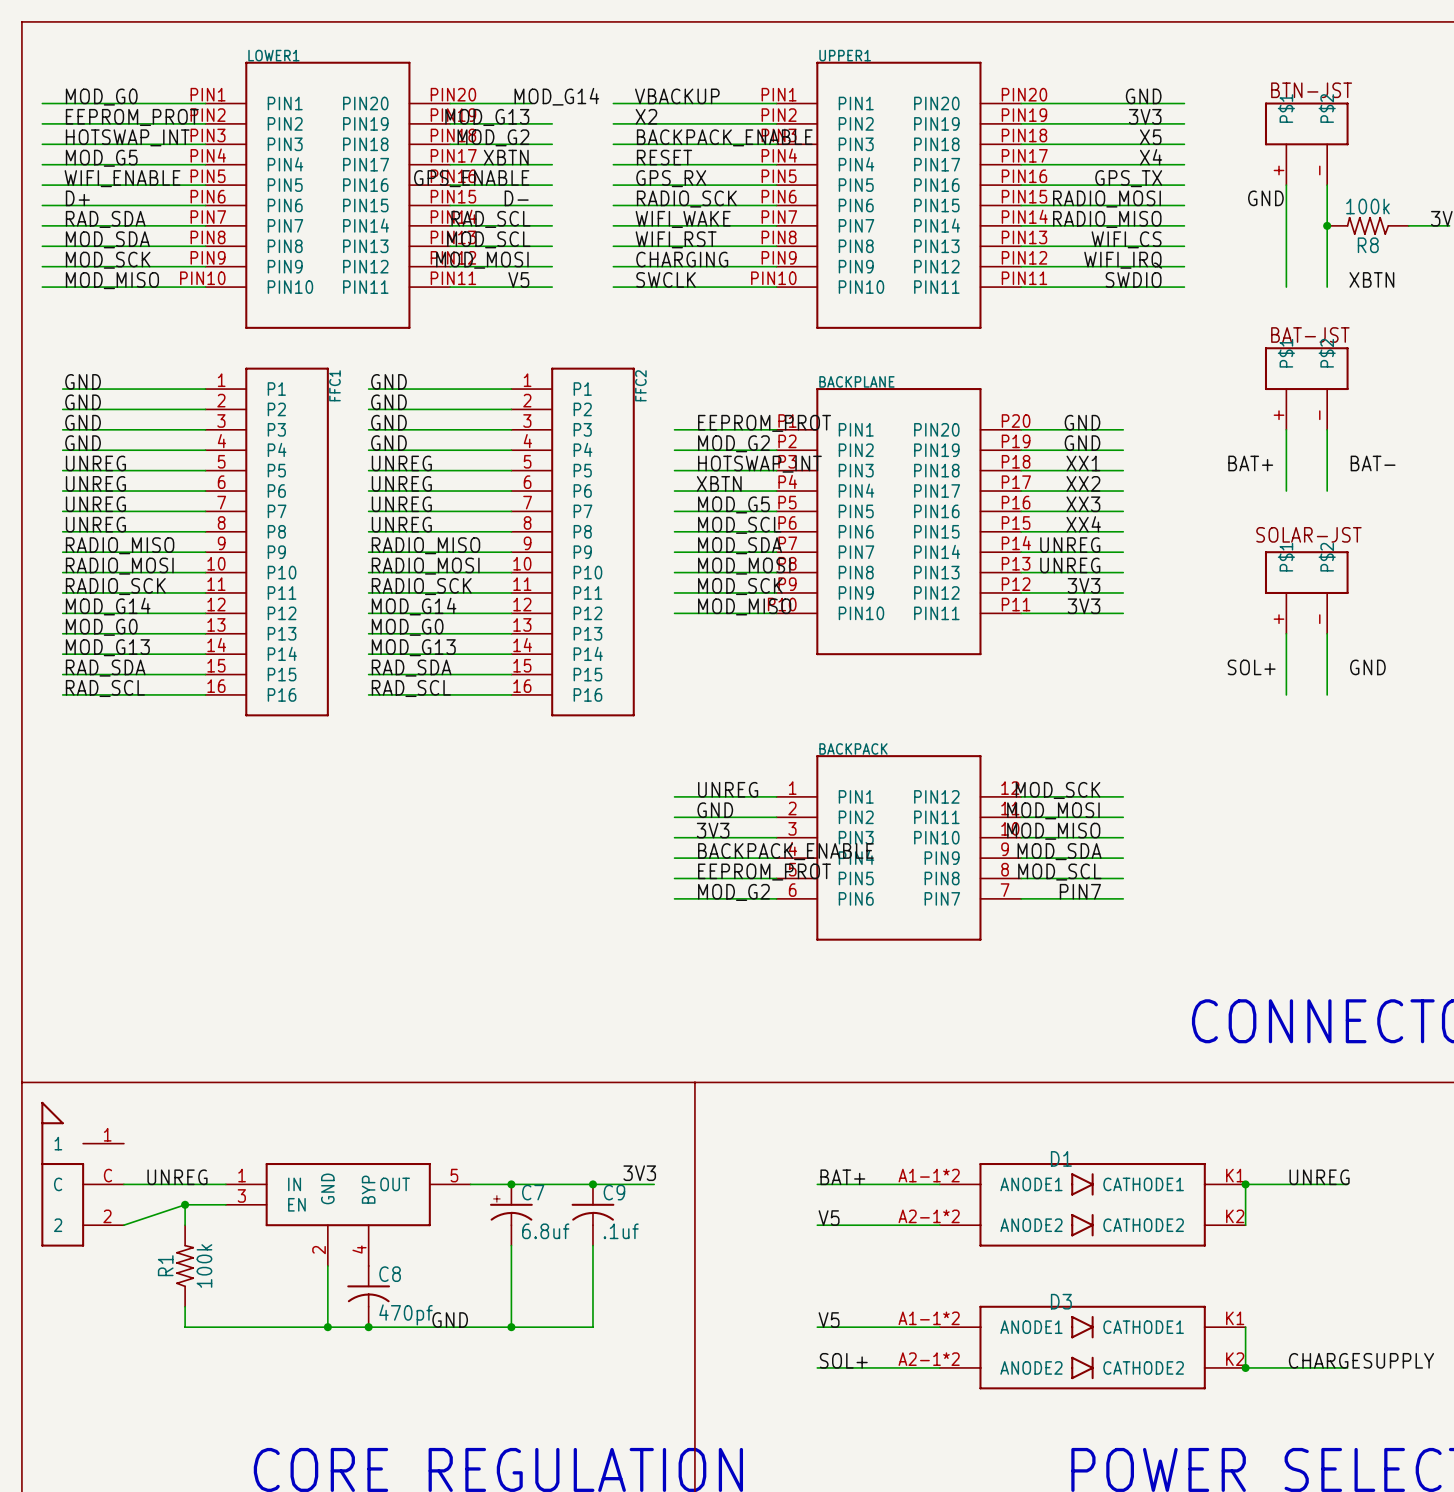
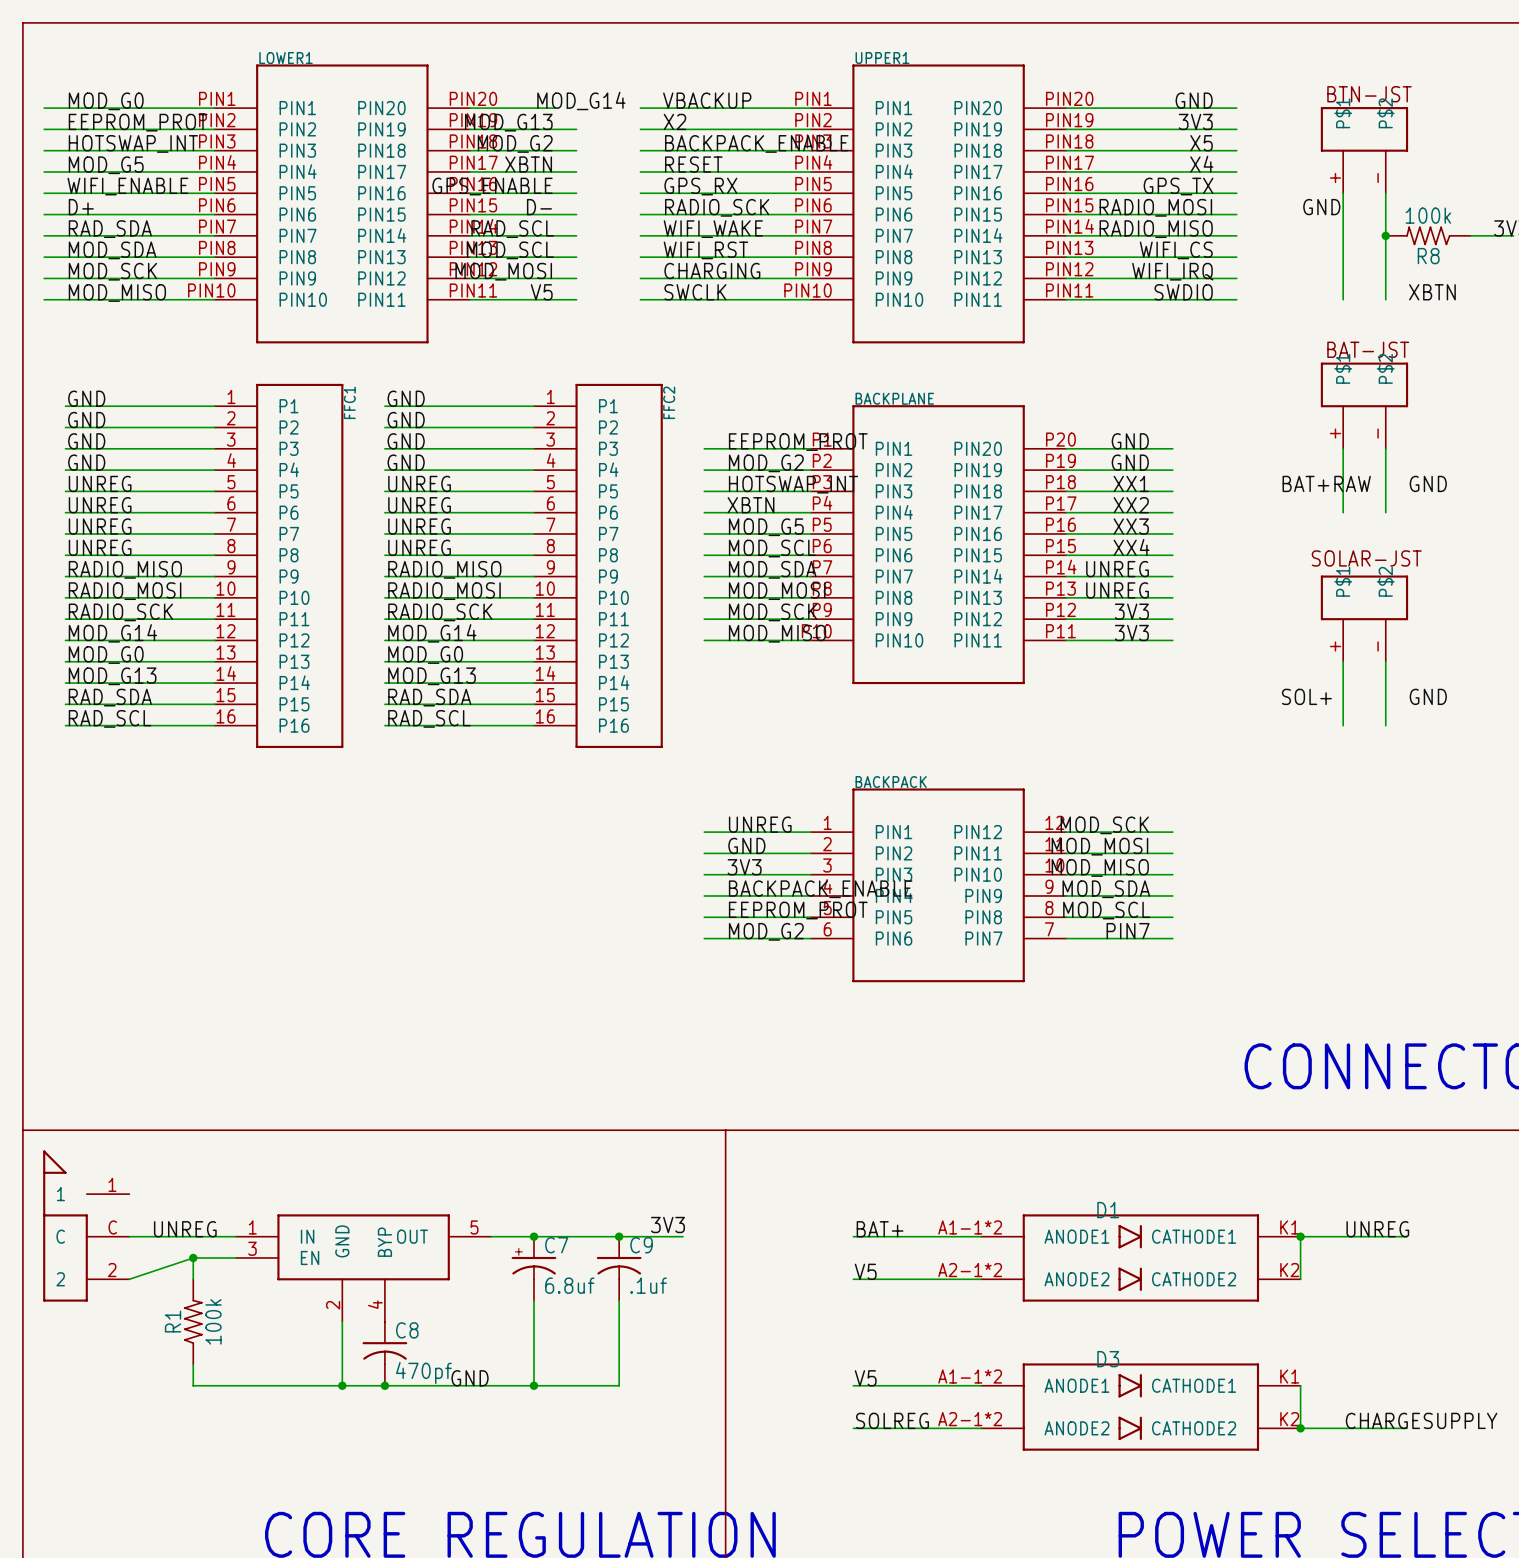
label: BAT+ (1250, 463) -> BAT+RAW (1326, 483)
label: BAT- (1373, 463) -> GND (1428, 483)
label: SOL+ (843, 1360) -> SOLREG (892, 1420)

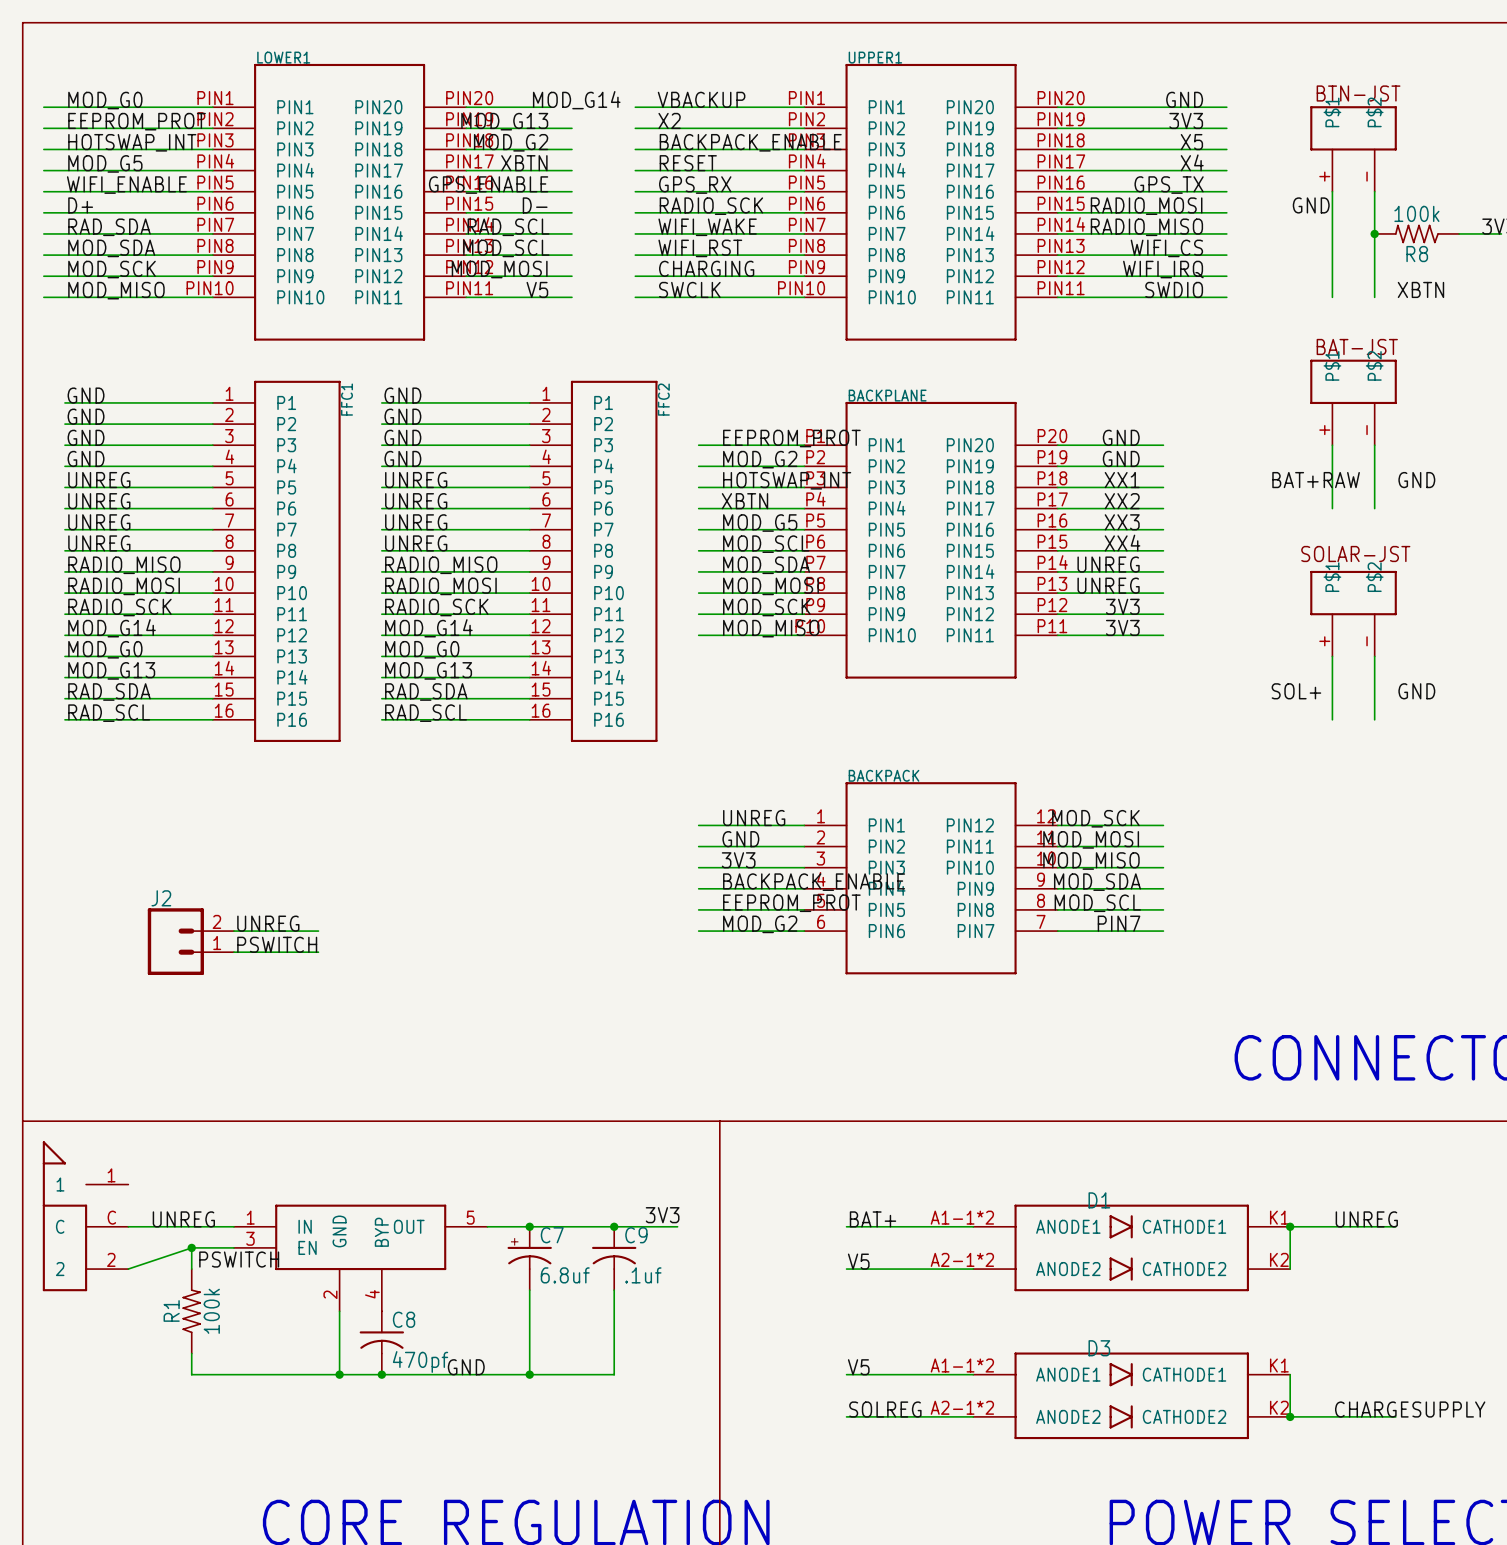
label: none -> UNREG (268, 923)
wire: none -> (233, 931) (318, 931)
J2: none -> (190, 941)
label: none -> PSWITCH (277, 944)
wire: none -> (233, 952) (318, 952)
label: none -> PSWITCH (239, 1259)

